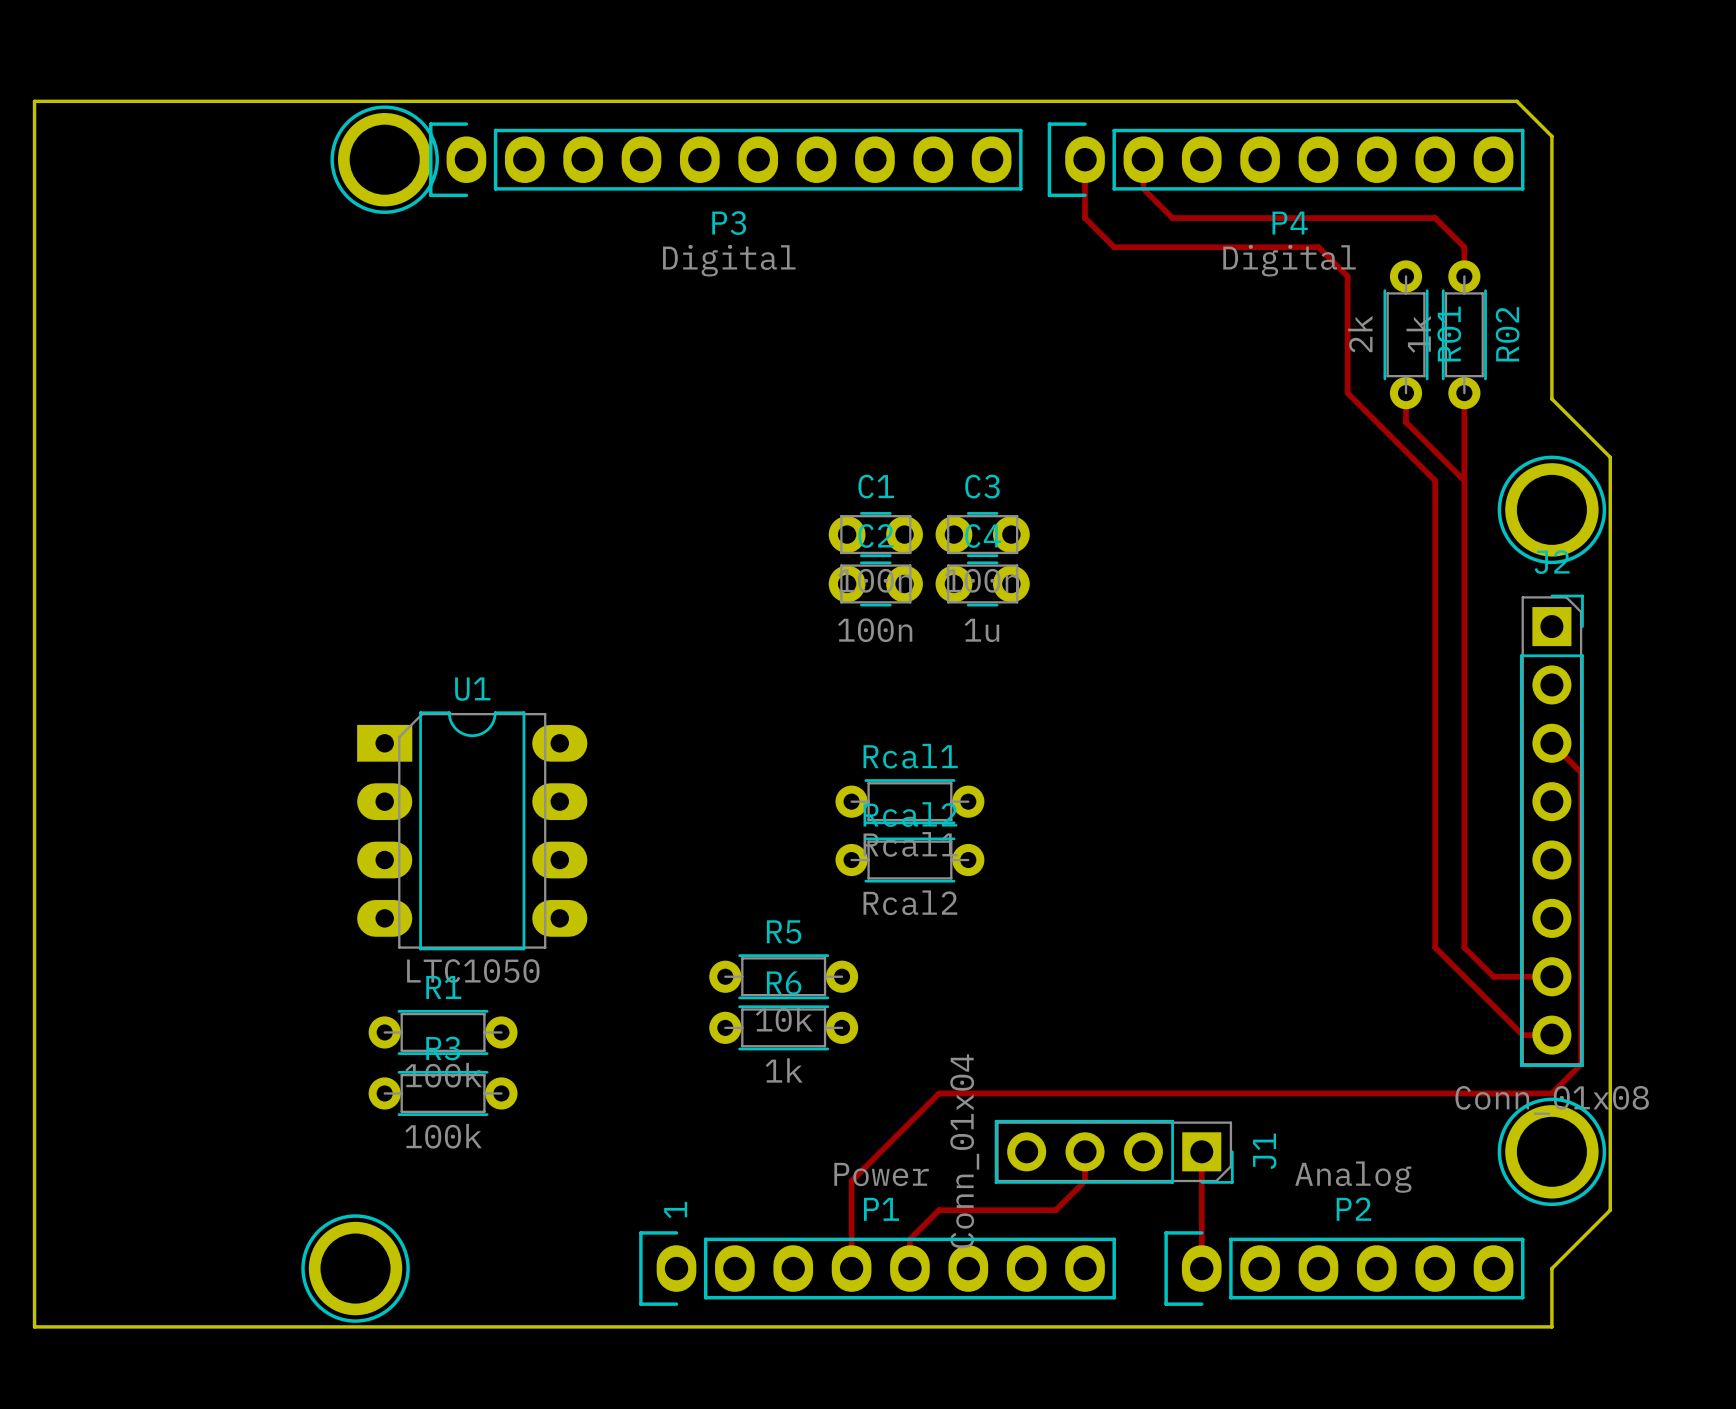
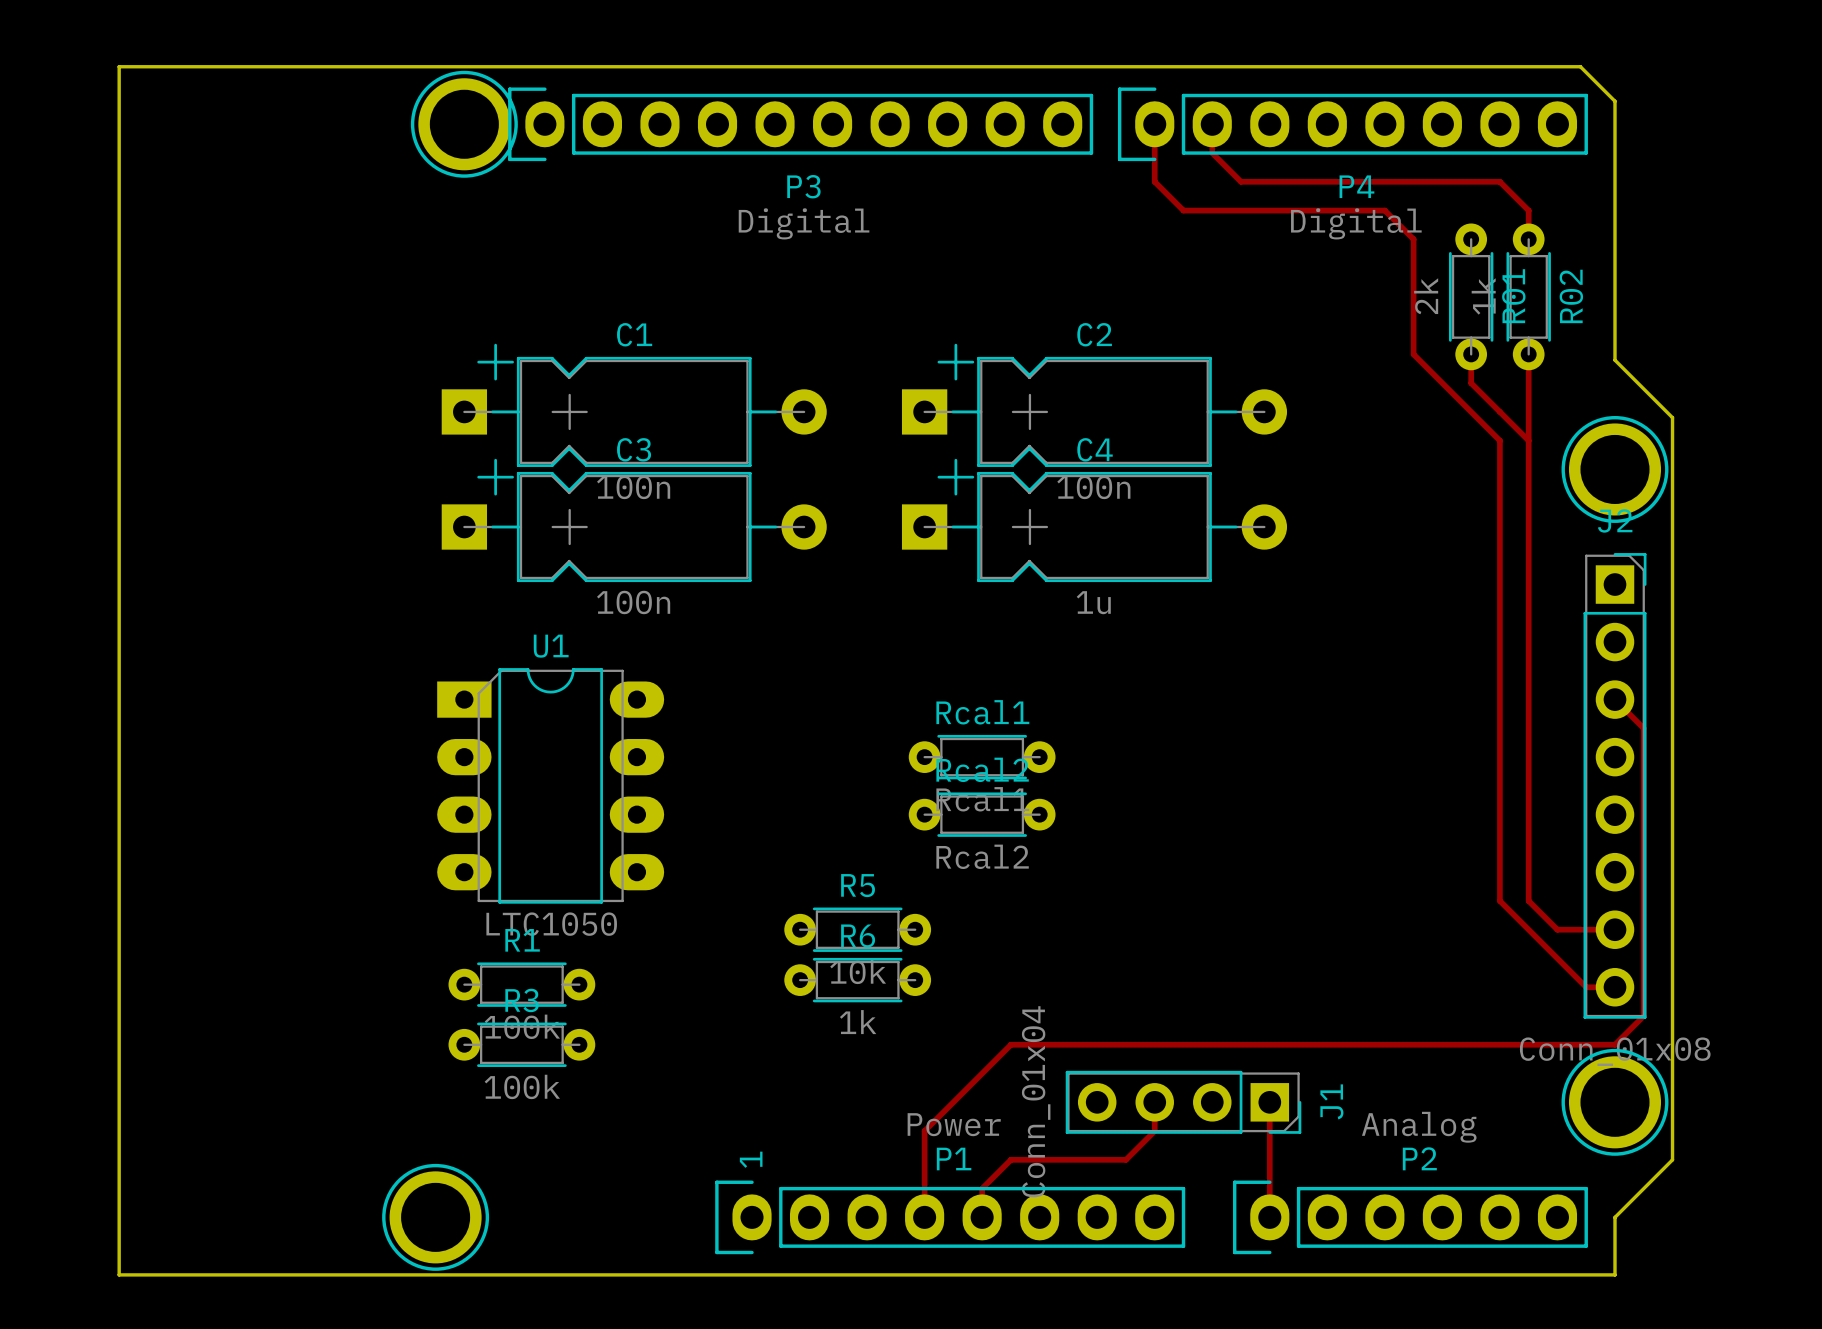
C1 footprint: [828, 512, 923, 558] -> [441, 343, 827, 467]
C3 footprint: [935, 512, 1030, 558] -> [441, 458, 827, 583]
C2 footprint: [828, 561, 923, 607] -> [901, 343, 1288, 467]
C4 footprint: [935, 561, 1030, 607] -> [901, 458, 1288, 583]

